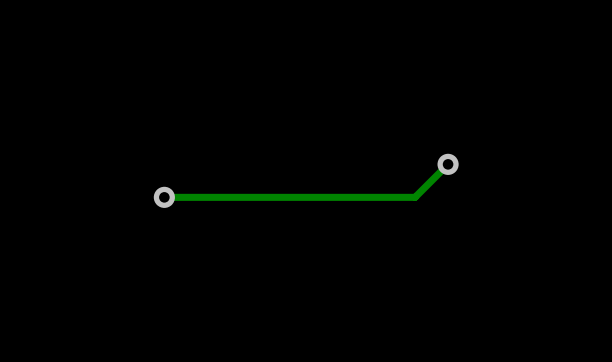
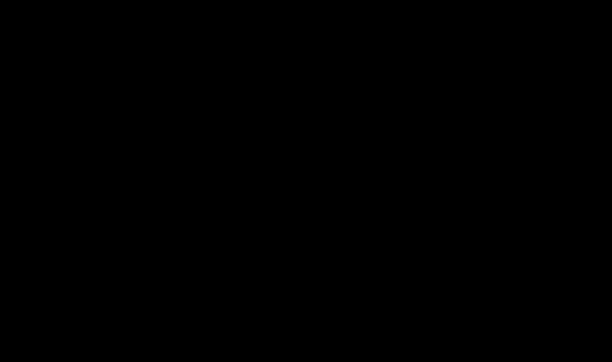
track: (448, 164) (415, 197) (164, 197) -> none
via: (448, 164) -> none
via: (164, 197) -> none

